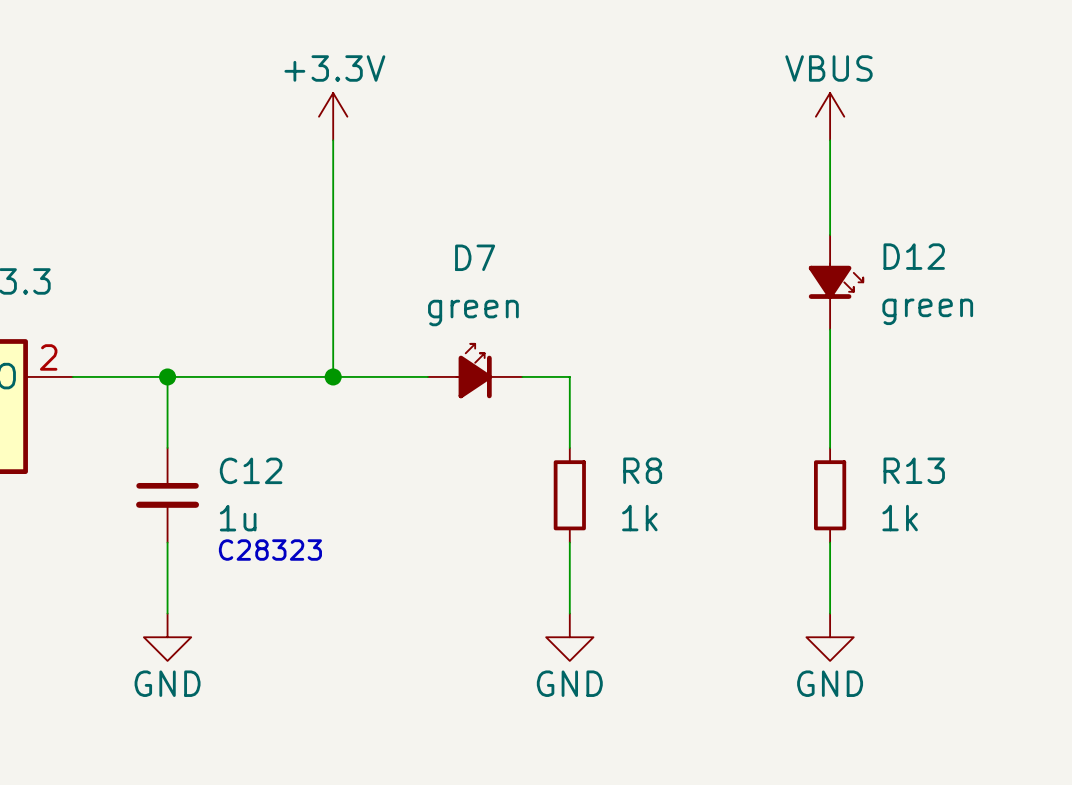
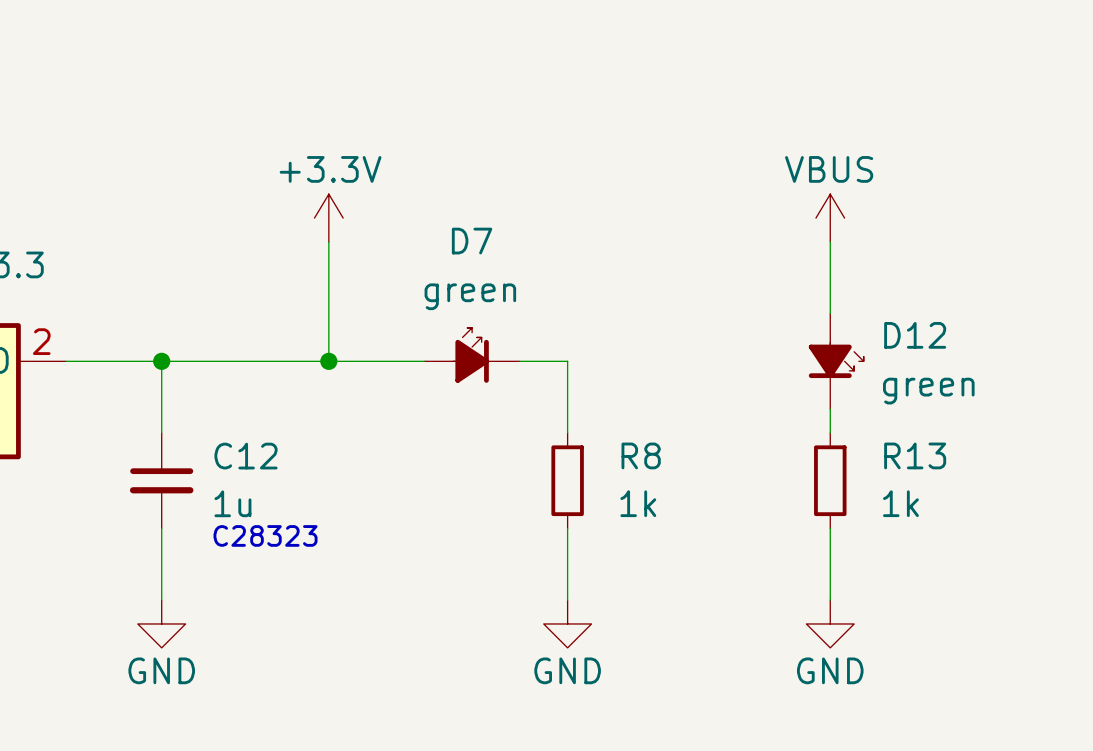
power symbol position: +3.3V (333, 116) -> +3.3V (328, 218)
power symbol position: VBUS (830, 116) -> VBUS (830, 218)
wire: (333, 140) (333, 258) -> none
wire: (830, 140) (830, 235) -> none
D12 position: (836, 282) -> (836, 361)

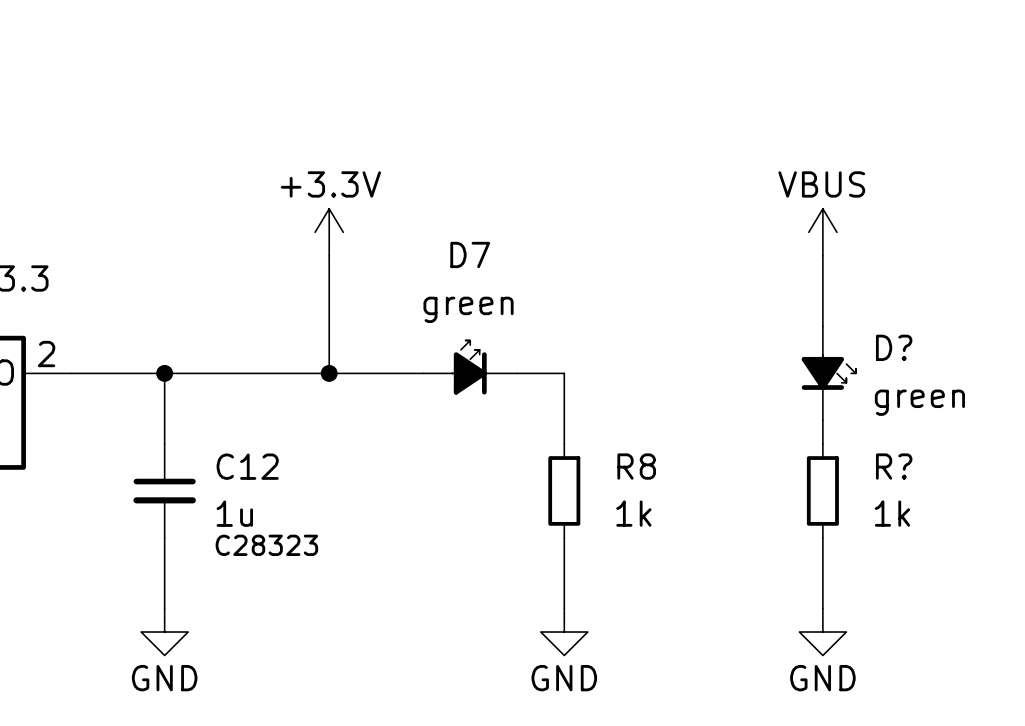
D12 name: D12 (915, 335) -> D? (894, 347)
R13 name: R13 (915, 455) -> R? (894, 466)

